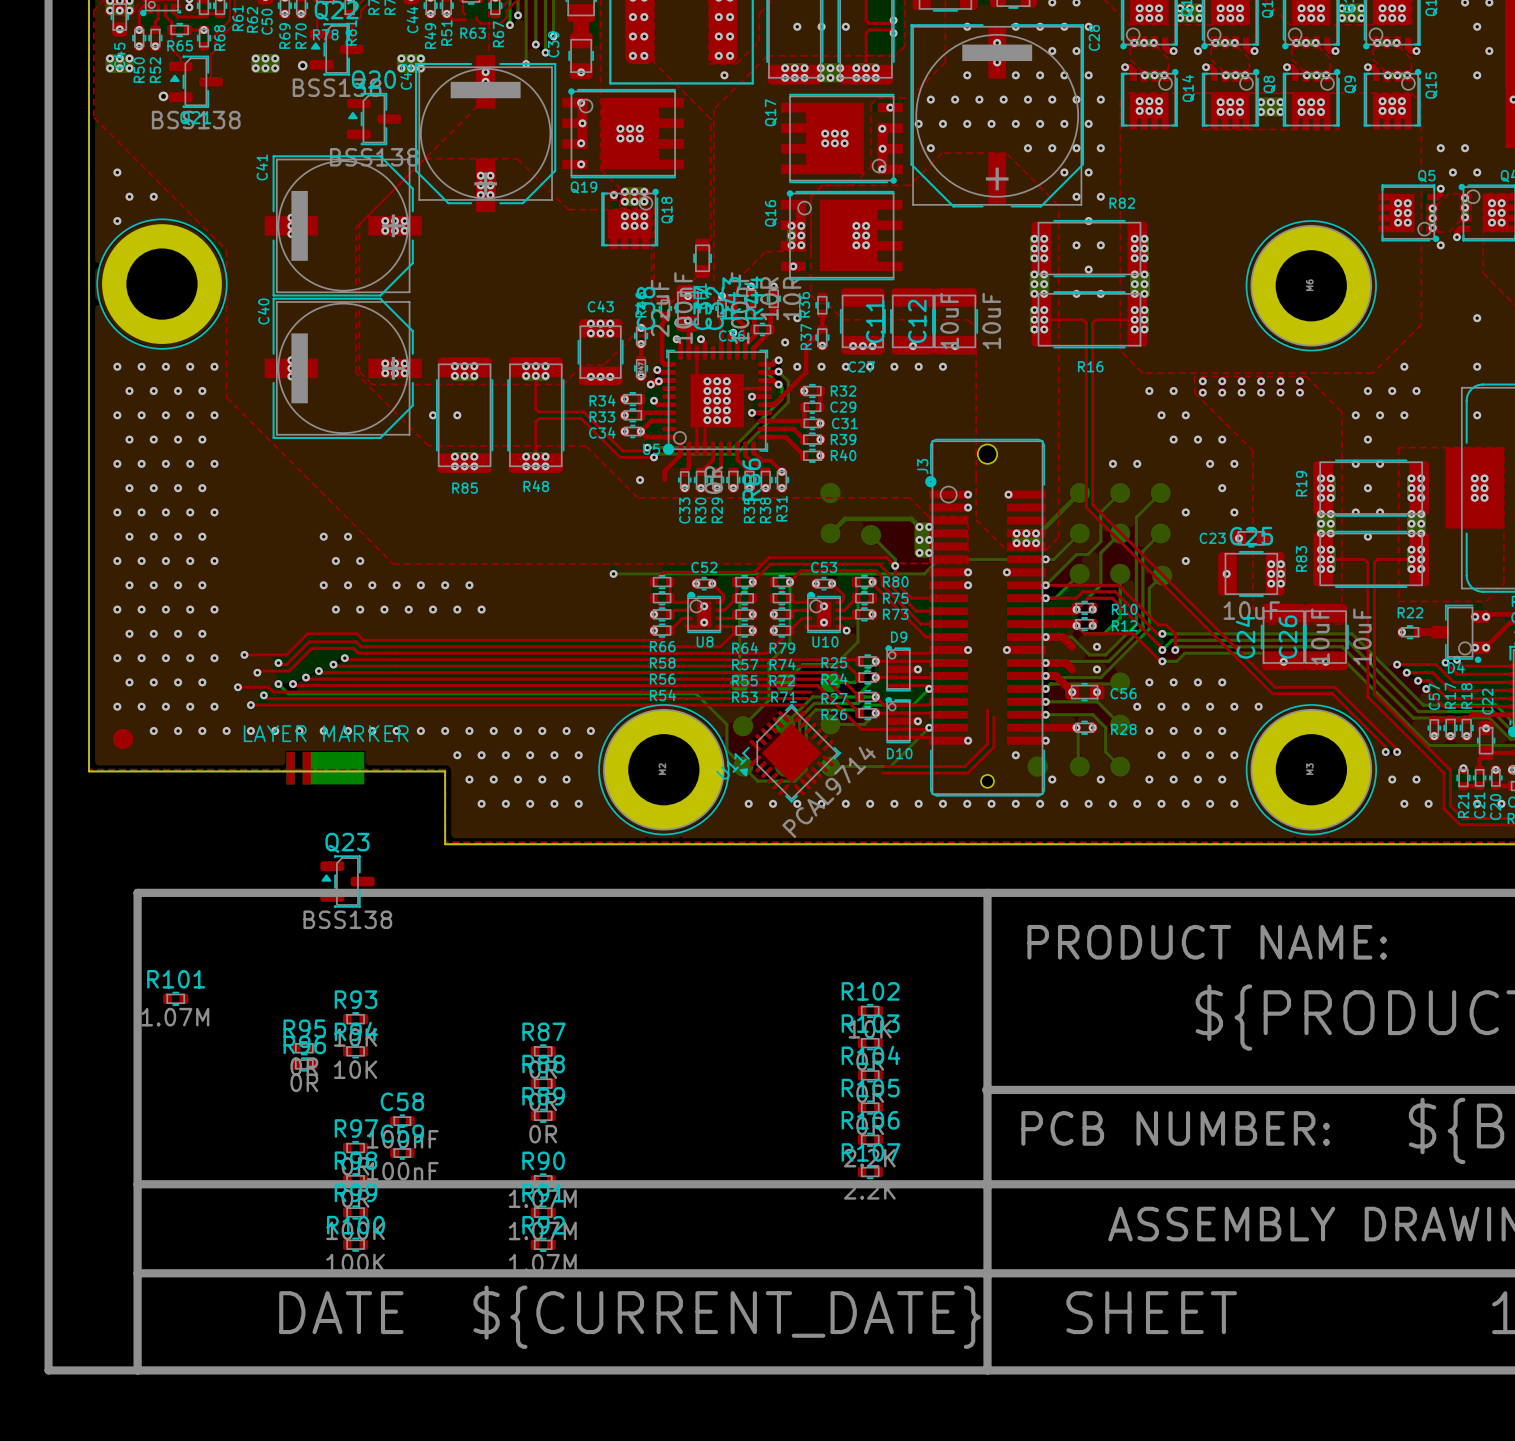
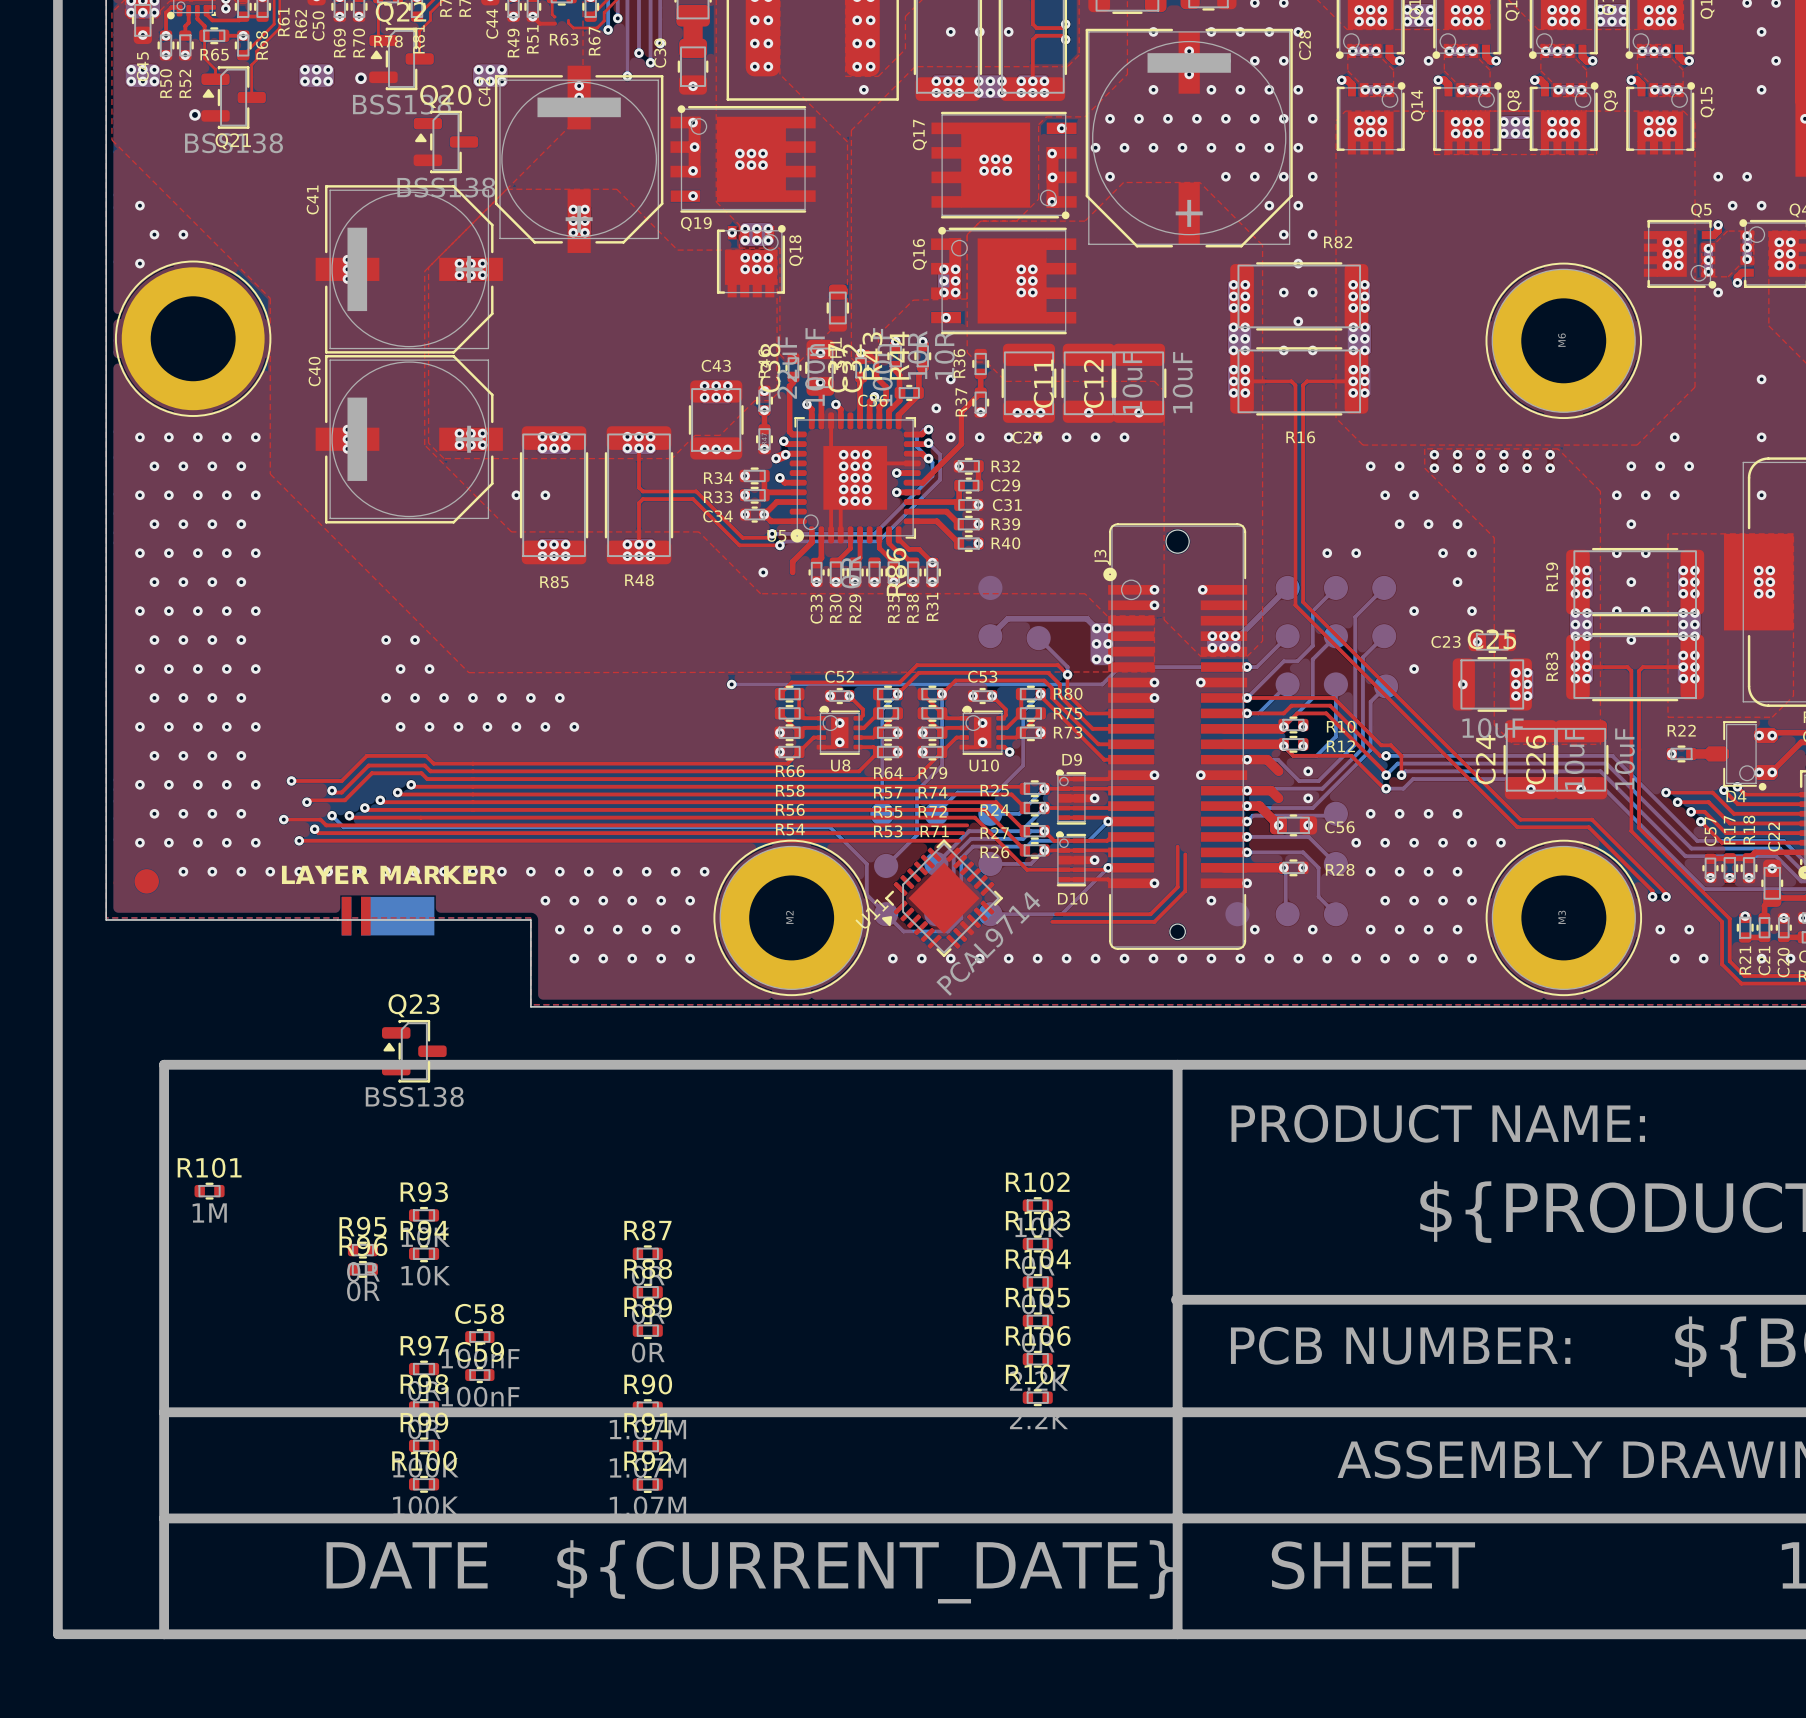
R101 value: 1.07M (175, 1017) -> 1M (209, 1212)

